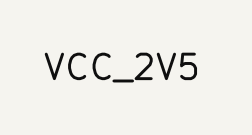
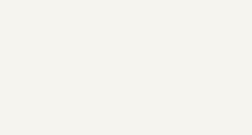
label: VCC_2V5 (120, 67) -> none

